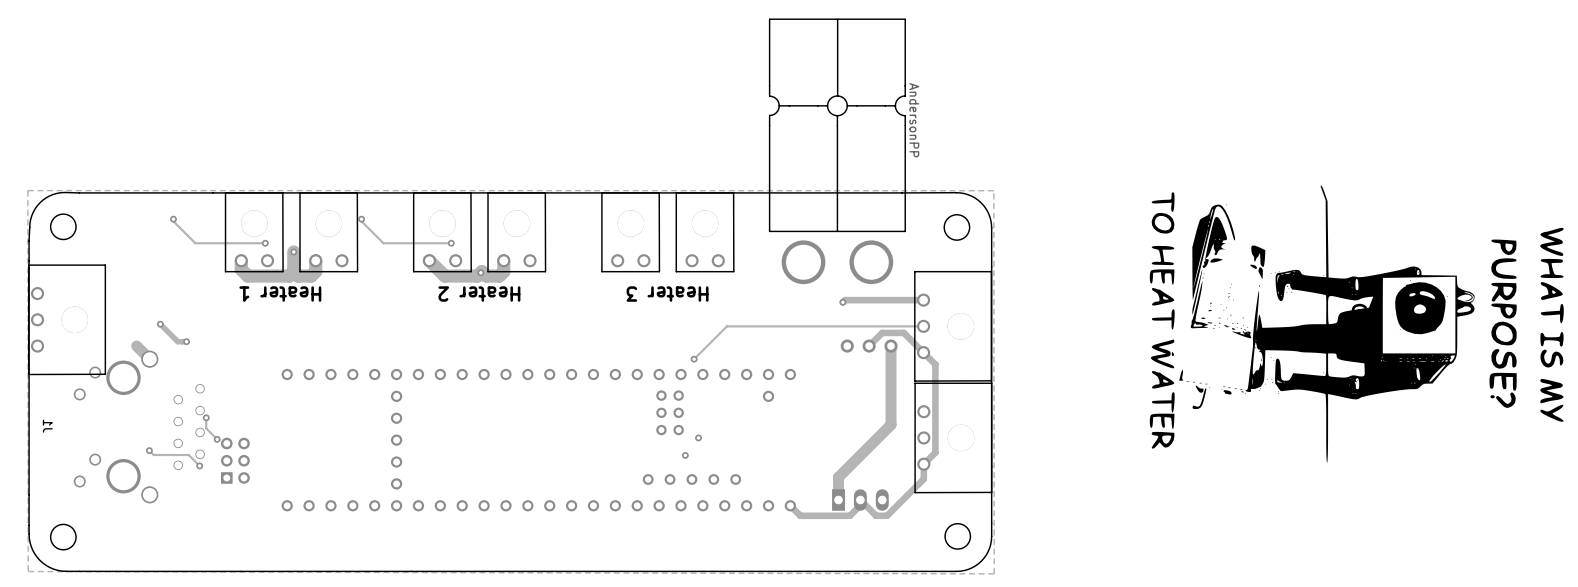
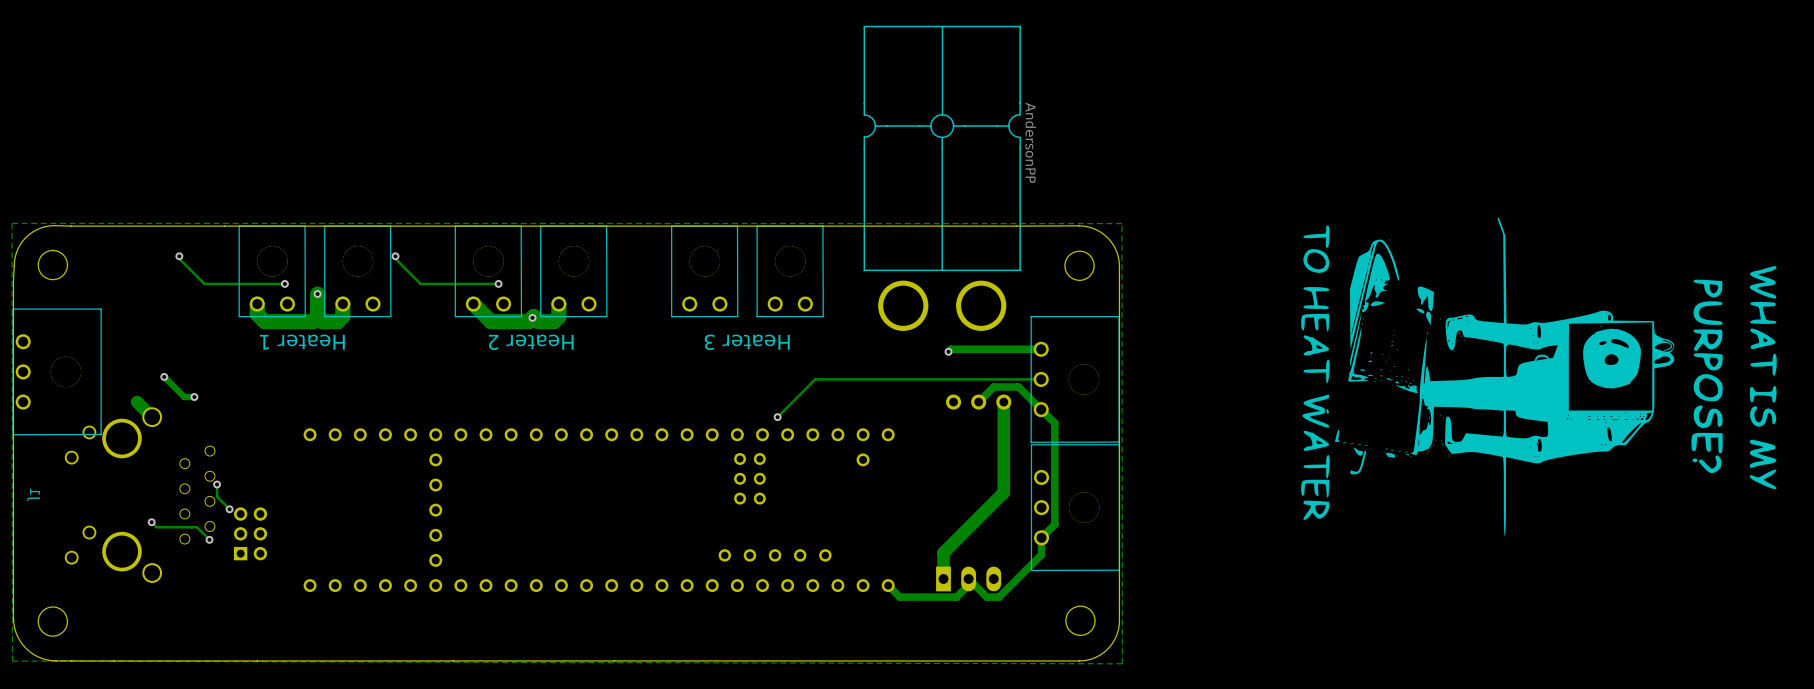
via: (698, 437) -> none
via: (685, 455) -> none

